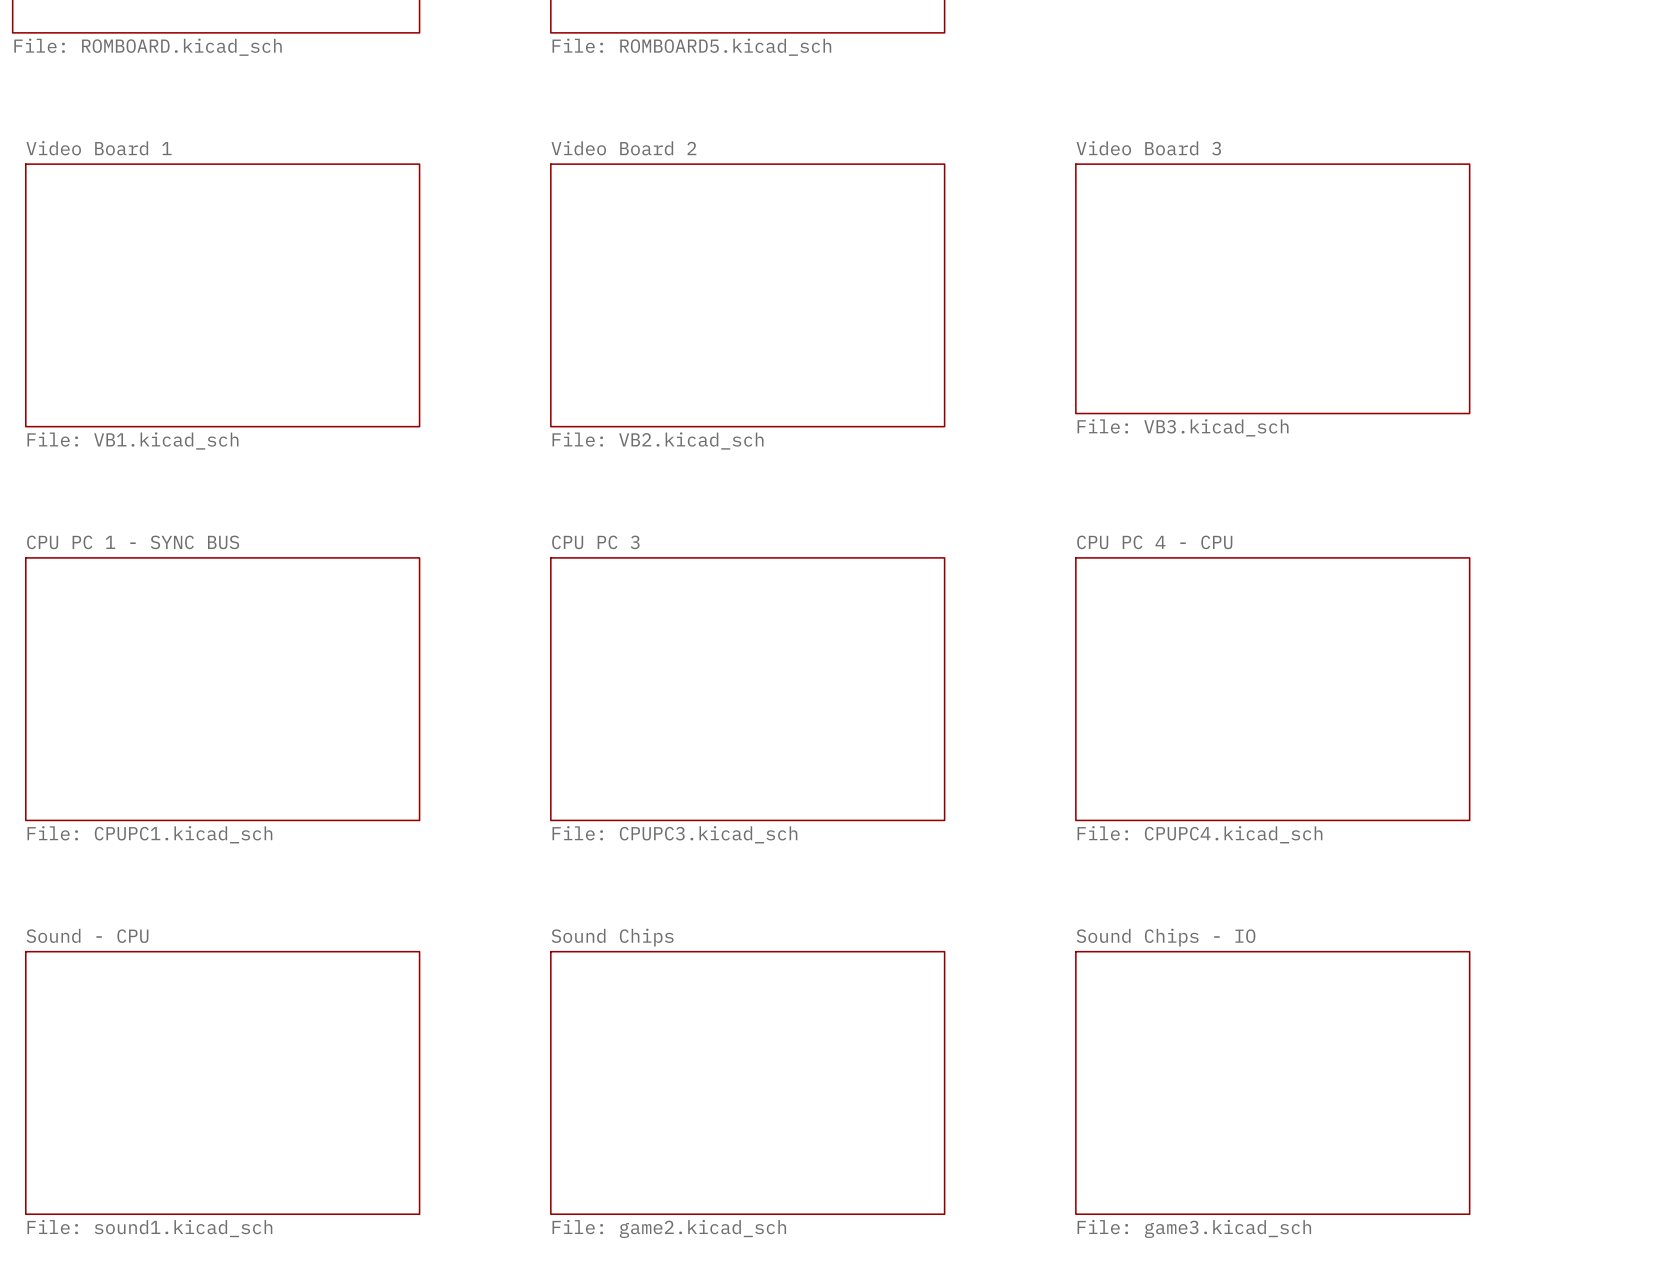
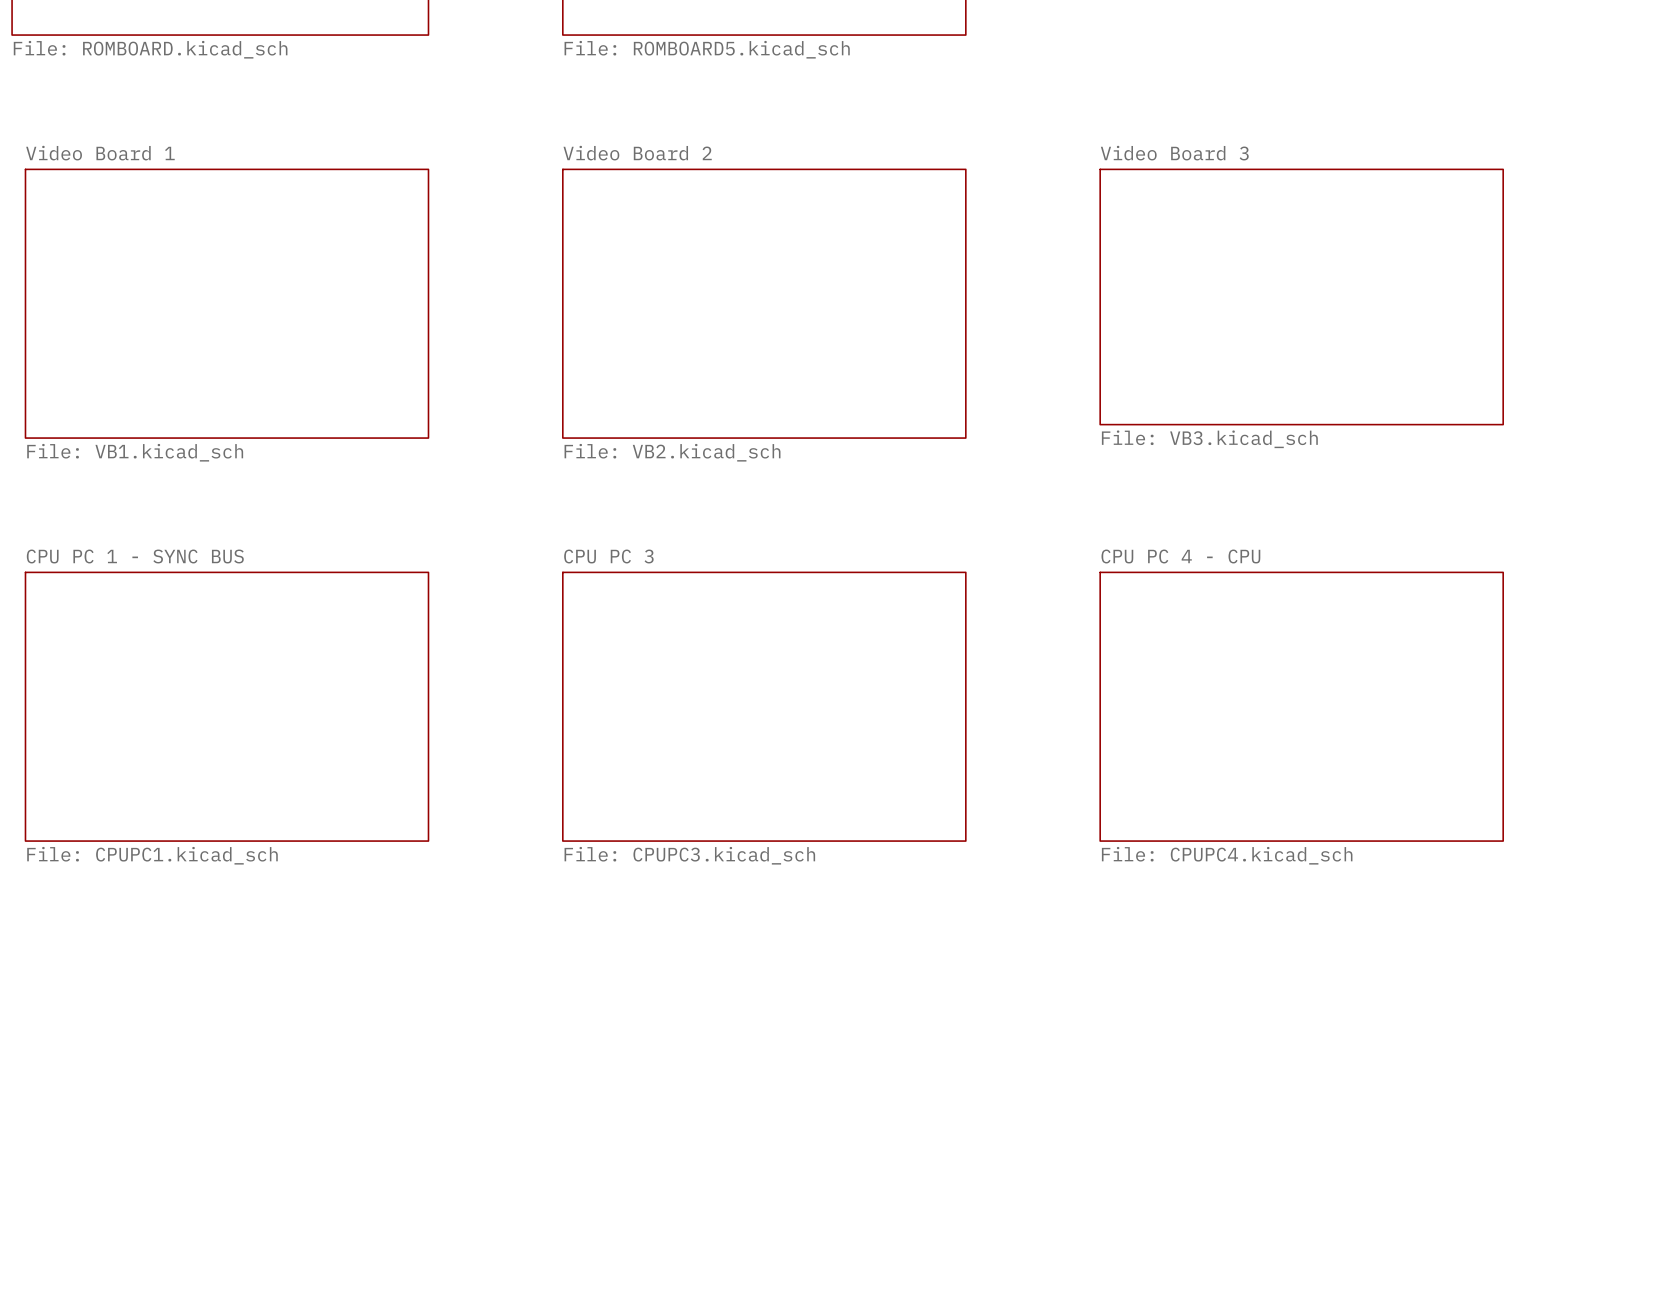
sheet Sound - CPU: File: sound1.kicad_sch (222, 1082) -> none
sheet Sound Chips: File: game2.kicad_sch (747, 1082) -> none
sheet Sound Chips - IO: File: game3.kicad_sch (1272, 1082) -> none

